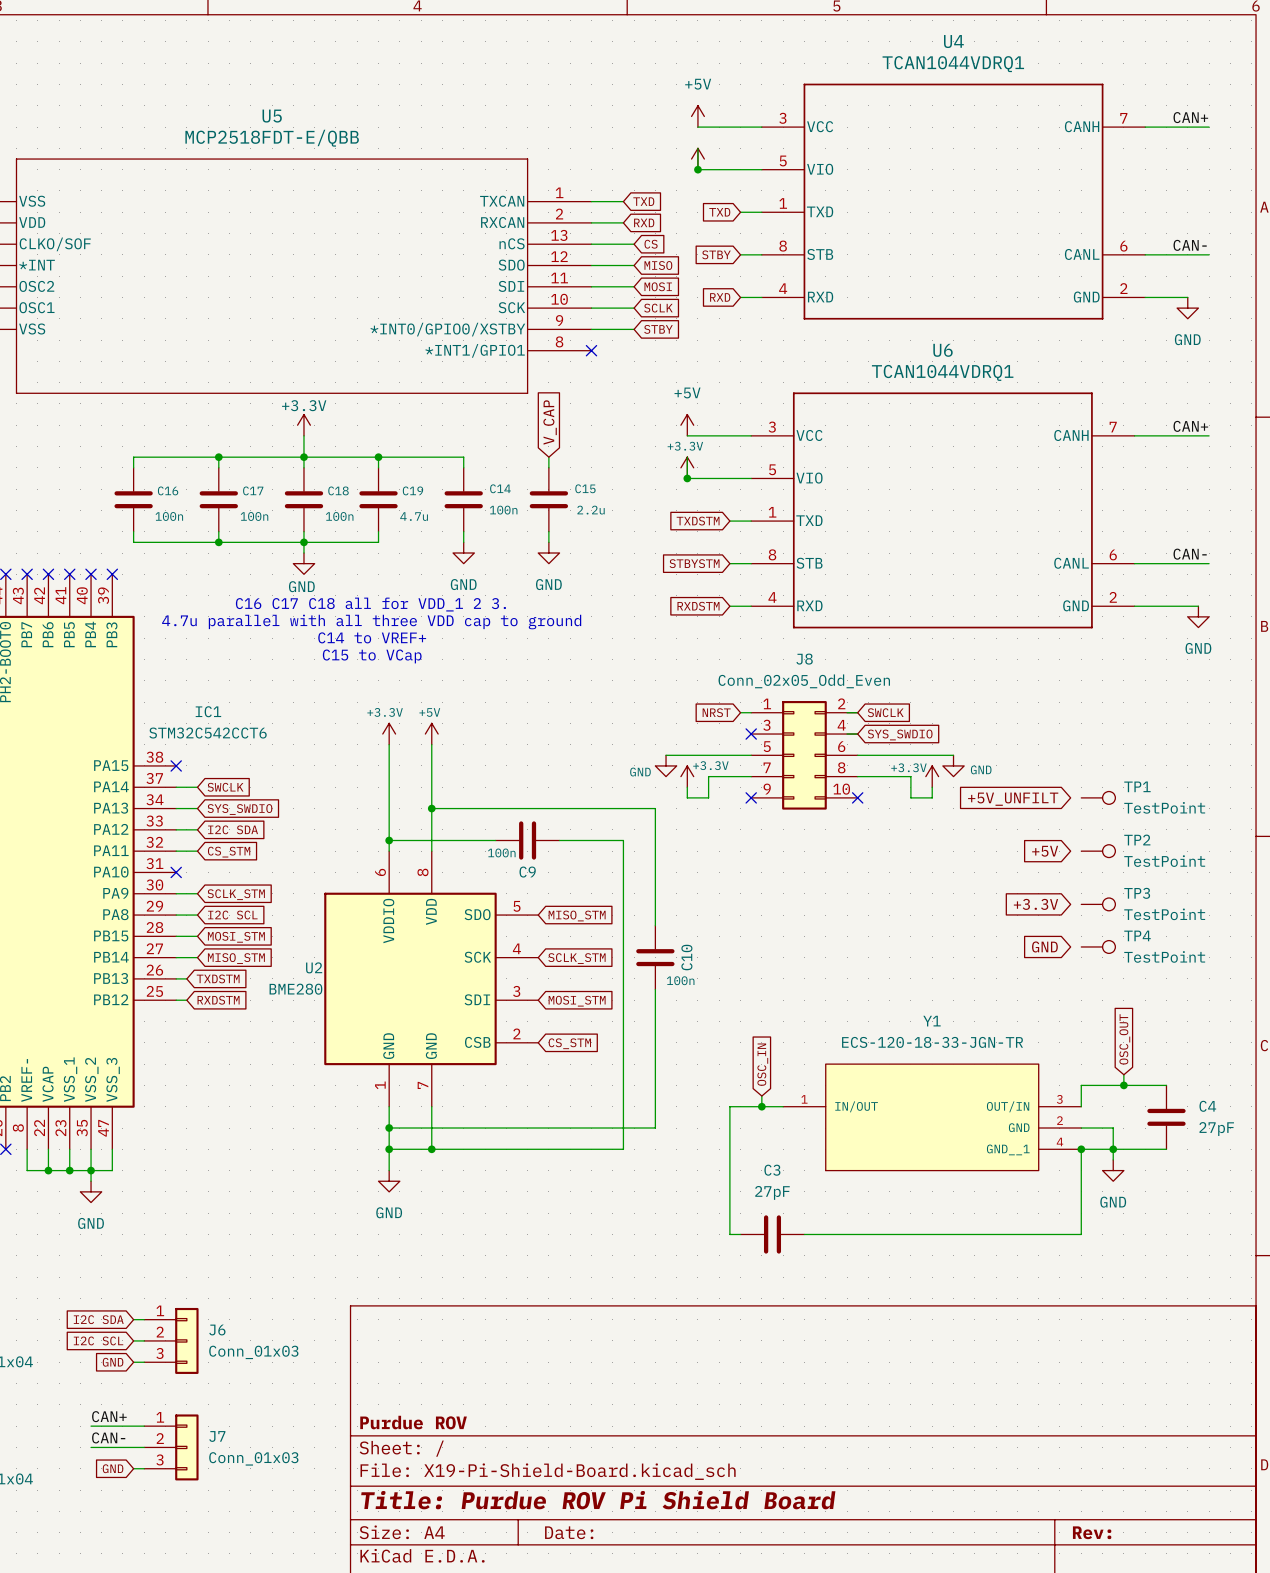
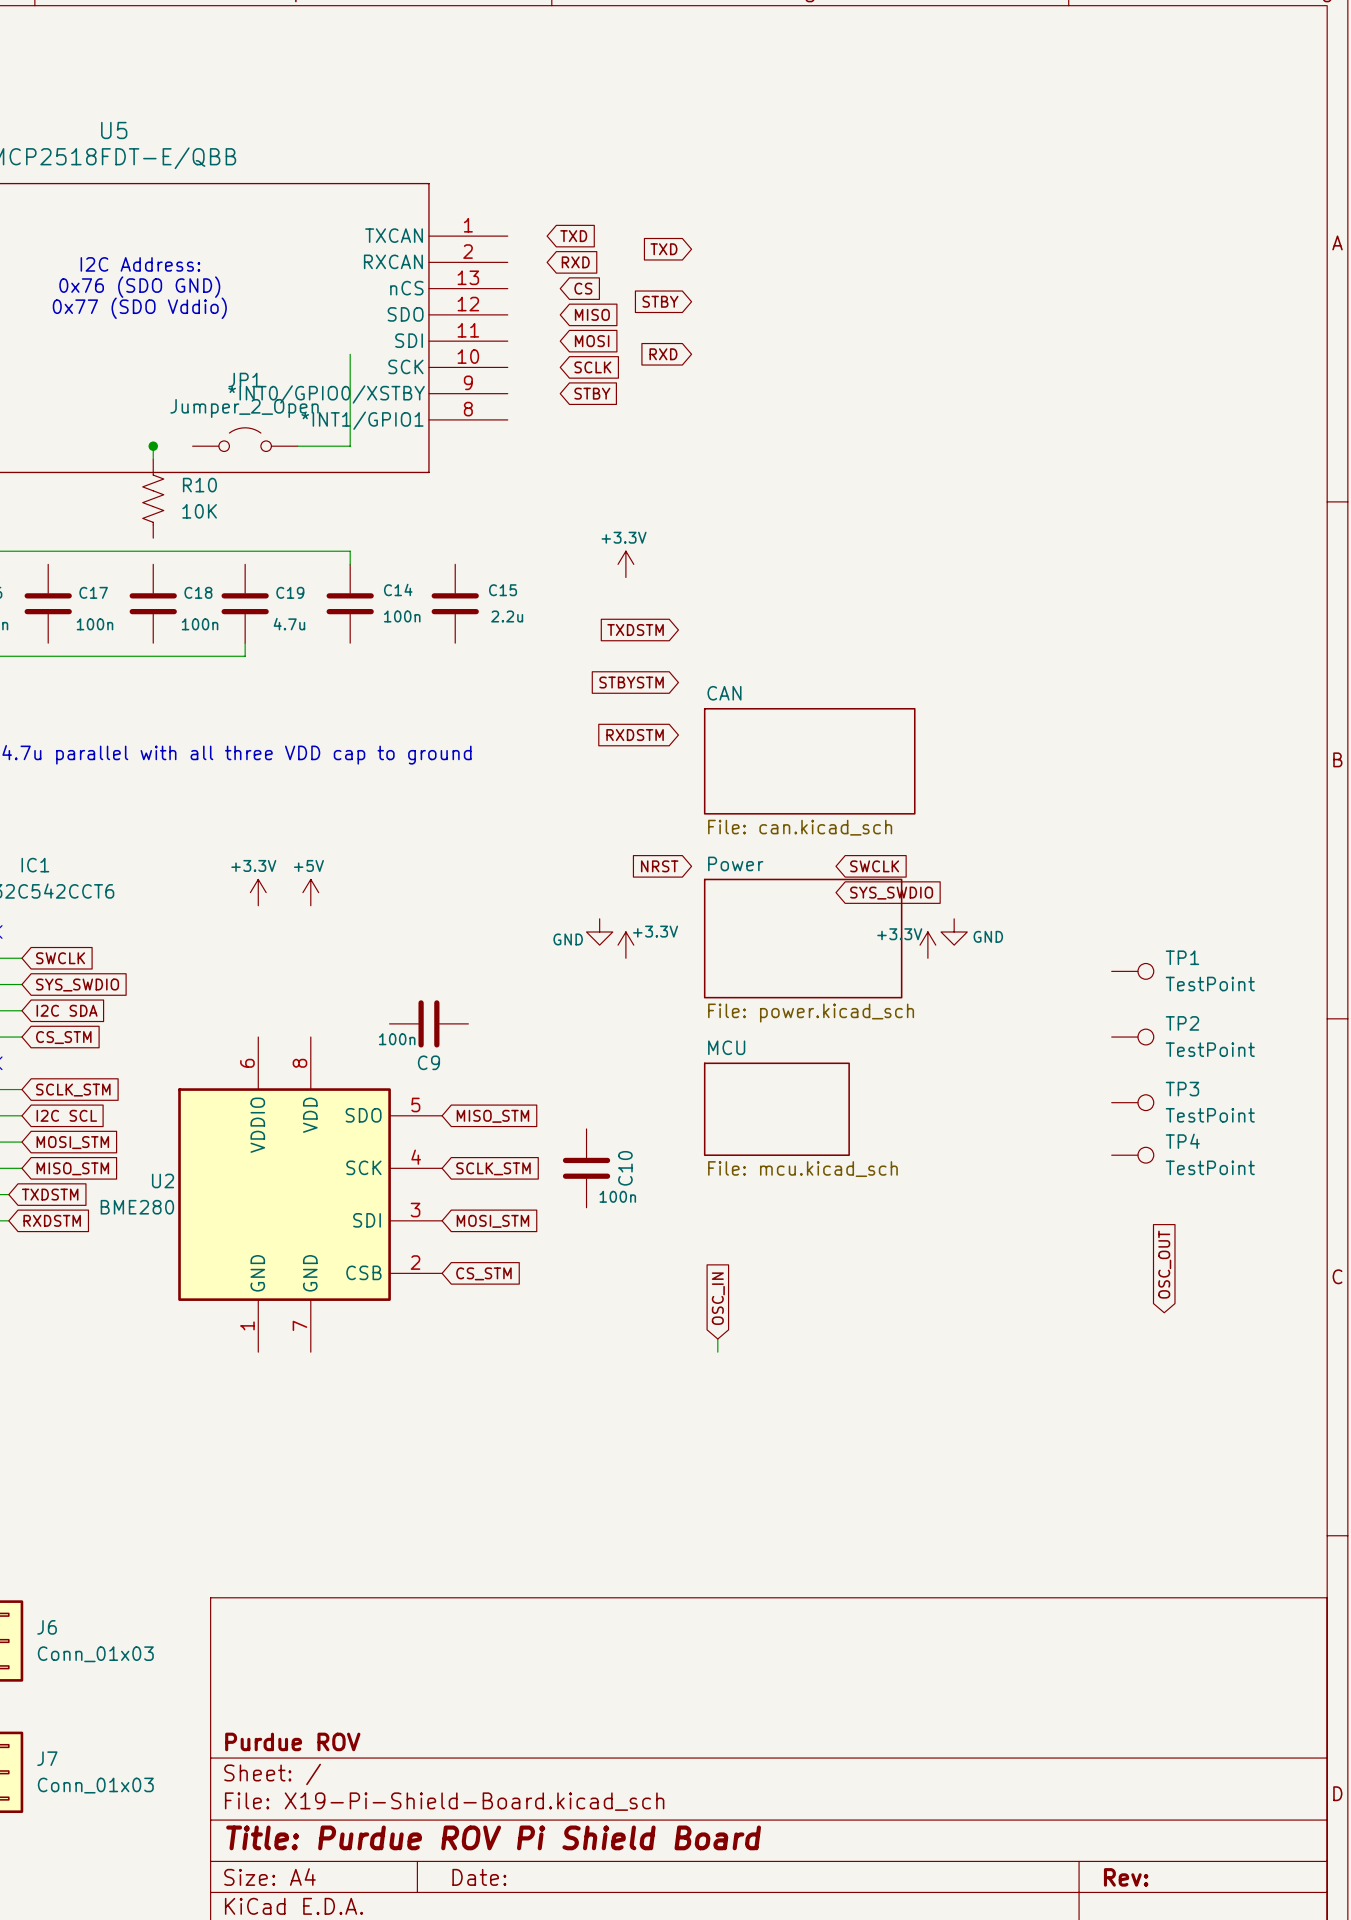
power symbol: +5V (697, 116) -> none
label: CAN+ (1190, 117) -> none
wire: (697, 127) (761, 127) -> none
wire: (1145, 127) (1209, 127) -> none
wire: (697, 148) (697, 169) (761, 169) -> none
power symbol: (697, 159) -> none
junction: (697, 169) -> none
wire: (591, 201) (623, 201) -> none
U4: TCAN1044VDRQ1 (953, 201) -> none
wire: (740, 212) (761, 212) -> none
wire: (591, 222) (623, 222) -> none
text: none -> I2C Address: (140, 264)
text: none -> 0x76 (SDO GND) (139, 287)
wire: (591, 244) (634, 244) -> none
label: CAN- (1190, 245) -> none
wire: (740, 254) (761, 254) -> none
wire: (1145, 254) (1209, 254) -> none
text: none -> 0x77 (SDO Vddio) (139, 308)
wire: (591, 265) (634, 265) -> none
wire: (591, 286) (634, 286) -> none
wire: none -> (350, 354) (350, 446) (297, 446)
wire: (740, 297) (761, 297) -> none
wire: (1145, 297) (1187, 297) -> none
wire: (591, 308) (634, 308) -> none
power symbol: GND (1187, 308) -> none
wire: (591, 329) (634, 329) -> none
no-connect mark: (591, 350) -> none
JP1: none -> Jumper_2_Open (245, 439)
junction: none -> (153, 446)
R10: none -> 10K (153, 498)
global label: V_CAP (550, 422) -> none
power symbol: +3.3V (303, 425) -> none
power symbol: +5V (687, 425) -> none
label: CAN+ (1190, 426) -> none
wire: (303, 435) (303, 467) -> none
wire: (687, 435) (751, 435) -> none
wire: (1134, 435) (1209, 435) -> none
wire: (218, 457) (218, 467) -> none
junction: (218, 457) -> none
junction: (303, 457) -> none
wire: (378, 457) (378, 467) -> (153, 446) (153, 459)
junction: (378, 457) -> none
wire: (548, 457) (548, 467) -> none
wire: (687, 457) (687, 478) (751, 478) -> none
junction: (687, 478) -> none
U6: TCAN1044VDRQ1 (942, 510) -> none
wire: (729, 521) (751, 521) -> none
wire: (218, 531) (218, 542) -> none
wire: (303, 531) (303, 553) -> none
wire: (463, 531) (463, 542) -> none
wire: (548, 531) (548, 542) -> none
junction: (218, 542) -> none
junction: (303, 542) -> none
power symbol: GND (463, 553) -> none
power symbol: GND (548, 553) -> none
label: CAN- (1190, 554) -> none
power symbol: GND (303, 563) -> none
wire: (729, 563) (751, 563) -> none
wire: (1134, 563) (1209, 563) -> none
text: C16 C17 C18 all for VDD_1 2 3. (370, 604) -> none
wire: (729, 606) (751, 606) -> none
wire: (1134, 606) (1198, 606) -> none
power symbol: GND (1198, 616) -> none
sheet CAN: none -> File: can.kicad_sch (809, 761)
text: C14 to VREF+ (372, 637) -> none
text: C15 to VCap (372, 656) -> none
wire: (740, 712) (751, 712) -> none
wire: (847, 712) (857, 712) -> none
no-connect mark: (751, 734) -> none
wire: (847, 734) (857, 734) -> none
wire: (389, 744) (389, 851) -> none
wire: (431, 744) (431, 851) -> none
wire: (666, 755) (751, 755) -> none
J8: Conn_02x05_Odd_Even (804, 755) -> none
wire: (857, 755) (953, 755) -> none
sheet Power: none -> File: power.kicad_sch (803, 938)
wire: (751, 776) (708, 776) (708, 797) (687, 797) (687, 787) -> none
wire: (857, 776) (910, 776) (910, 797) (932, 797) (932, 787) -> none
no-connect mark: (751, 797) -> none
no-connect mark: (857, 797) -> none
global label: +5V_UNFILT (1013, 799) -> none
wire: (431, 808) (655, 808) (655, 925) -> none
junction: (431, 808) -> none
wire: (389, 840) (495, 840) -> none
junction: (389, 840) -> none
wire: (559, 840) (623, 840) (623, 1149) (389, 1149) -> none
global label: +5V (1045, 851) -> none
global label: +3.3V (1035, 904) -> none
sheet MCU: none -> File: mcu.kicad_sch (776, 1109)
global label: GND (1044, 946) -> none
wire: (655, 989) (655, 1128) (389, 1128) -> none
wire: (1123, 1074) (1123, 1085) -> none
junction: (1123, 1085) -> none
wire: (1166, 1085) (1081, 1085) (1081, 1106) -> none
wire: (389, 1106) (389, 1170) -> none
wire: (431, 1106) (431, 1149) -> none
junction: (761, 1106) -> none
wire: (783, 1106) (729, 1106) (729, 1234) (740, 1234) -> none
Y1: ECS-120-18-33-JGN-TR (932, 1117) -> none
C4: 27pF (1166, 1117) -> none
junction: (389, 1128) -> none
wire: (1081, 1128) (1113, 1128) (1113, 1159) -> none
junction: (389, 1149) -> none
junction: (431, 1149) -> none
junction: (1081, 1149) -> none
junction: (1113, 1149) -> none
wire: (1166, 1149) (1081, 1149) (1081, 1234) (804, 1234) -> none
power symbol: GND (1113, 1170) -> none
power symbol: GND (389, 1181) -> none
C3: 27pF (772, 1234) -> none

